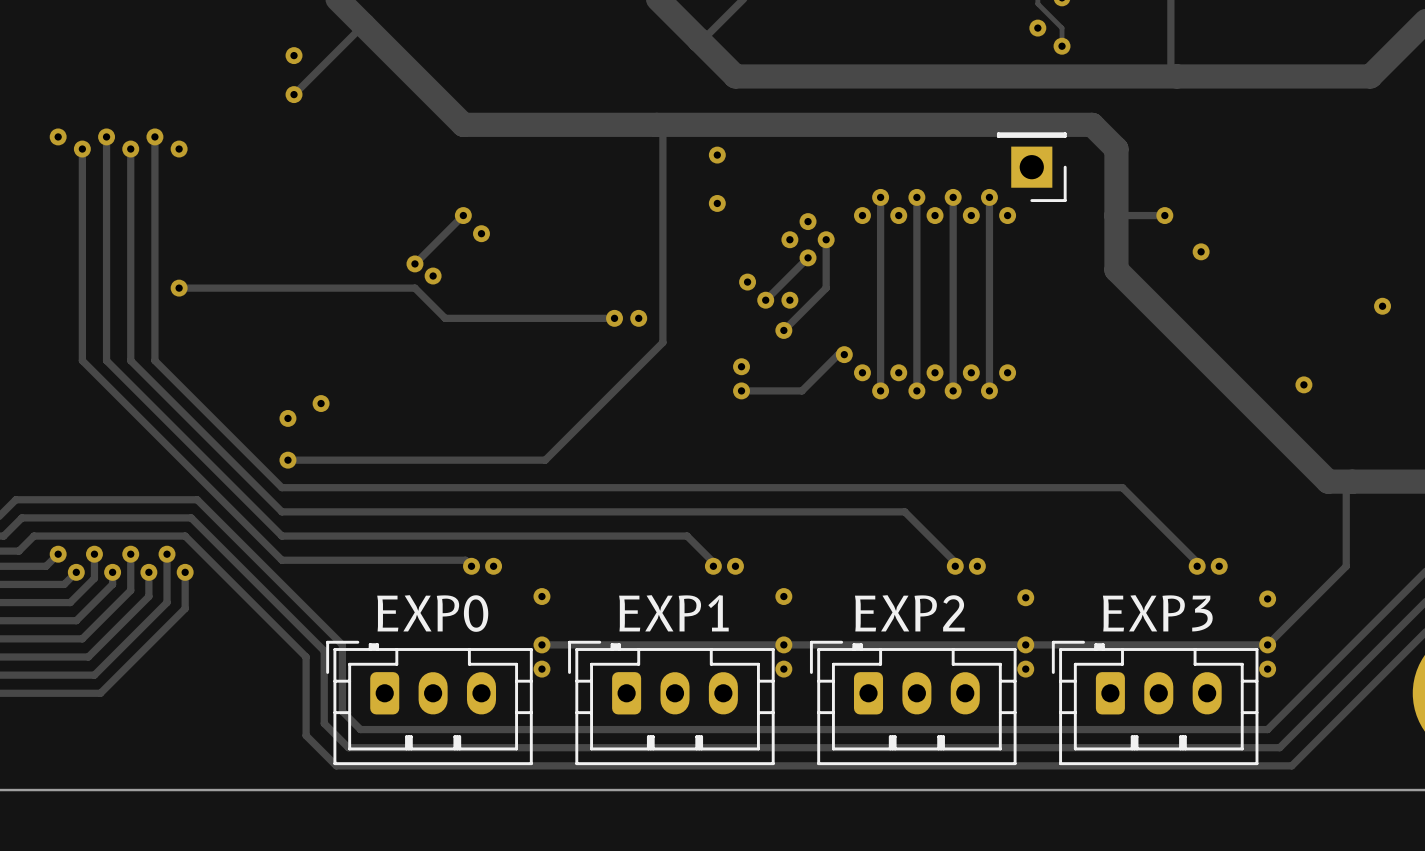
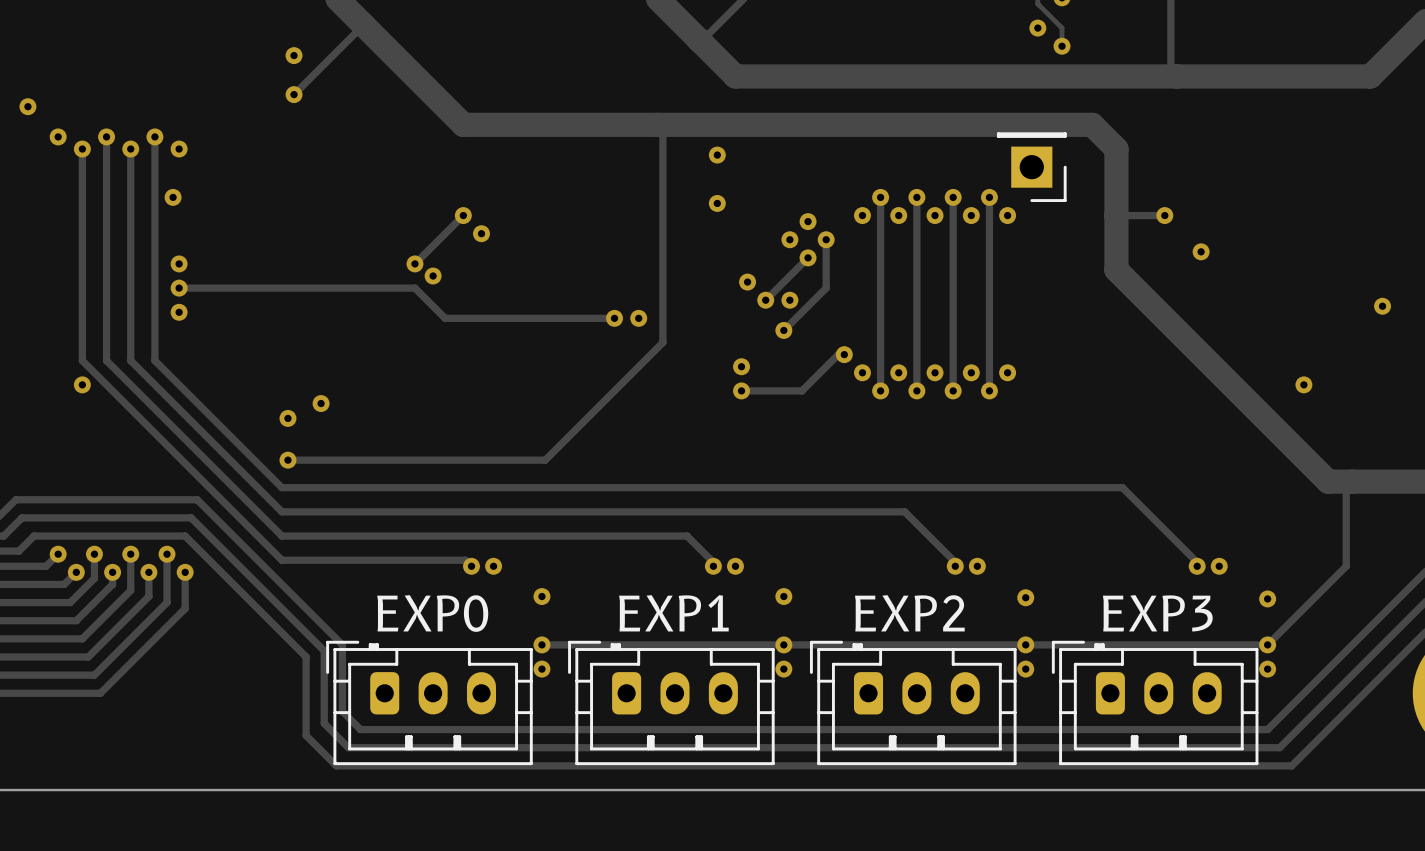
via: none -> (27, 106)
via: none -> (173, 197)
via: none -> (179, 263)
via: none -> (179, 312)
via: none -> (82, 384)

